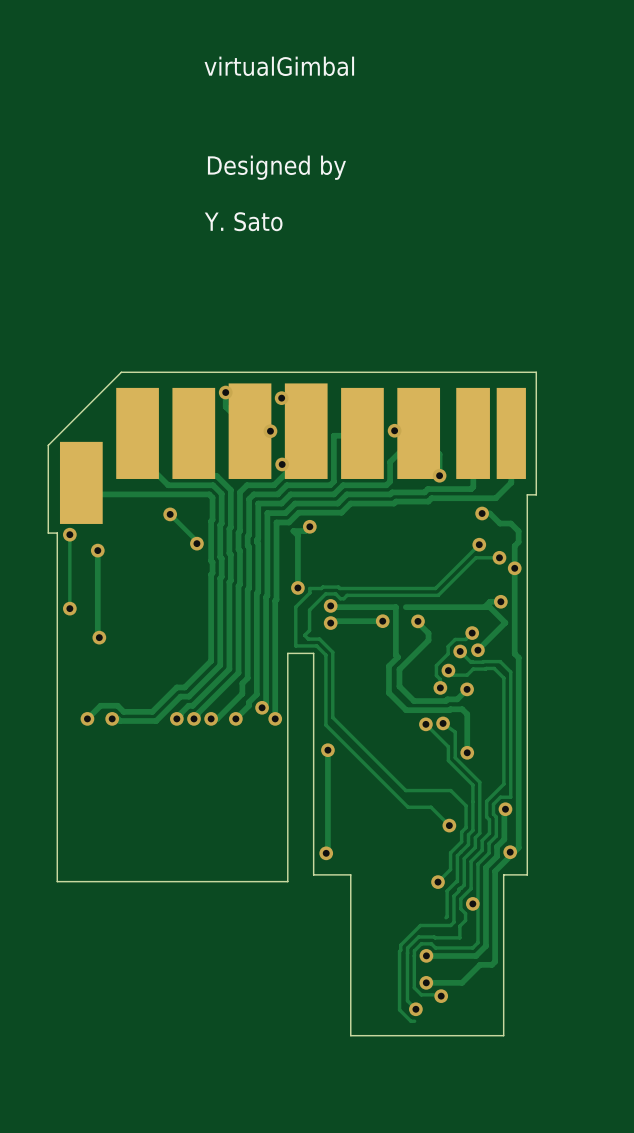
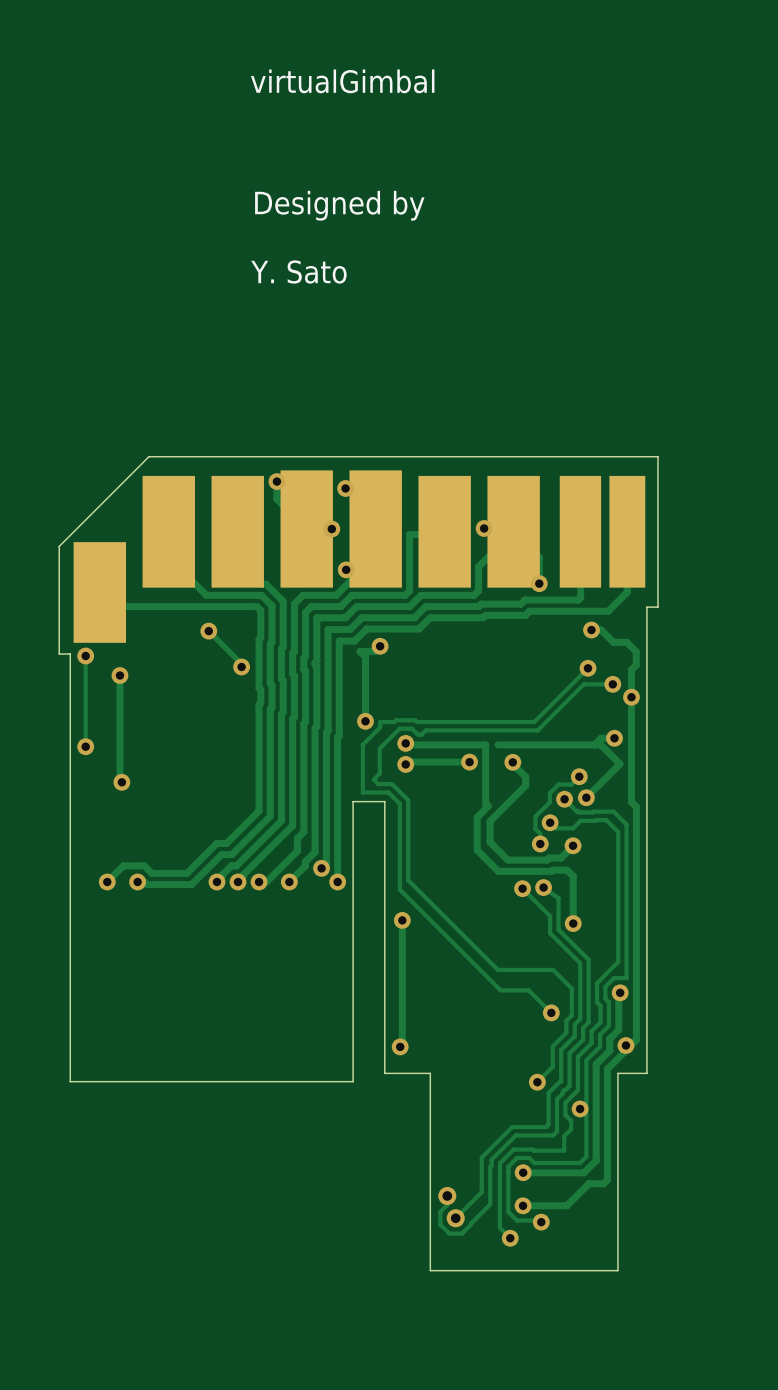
track: none -> (546, 1127) (512, 1127) (481, 1157) (481, 1192) (455, 1218)
via: none -> (447, 1195)
track: (399, 981) (399, 1009) (410, 1021) (414, 1021) -> (490, 1204) (462, 1233) (449, 1233) (440, 1224) (440, 1211) (447, 1204) (447, 1195)
via: none -> (455, 1218)

